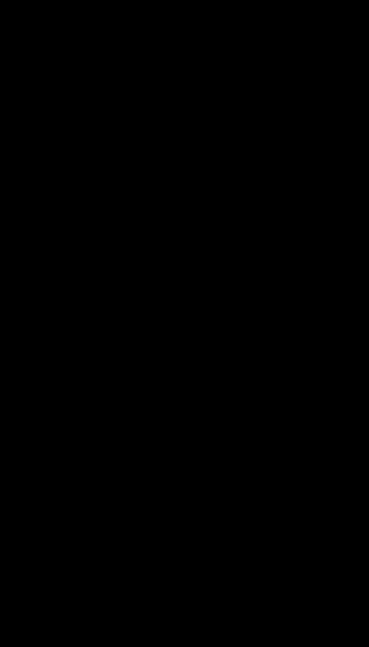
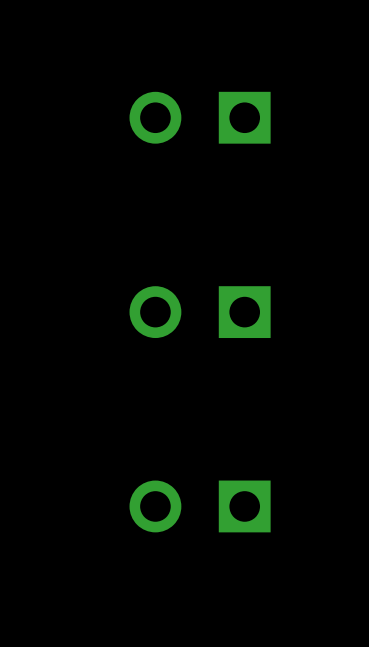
part: none -> (200, 117)
part: none -> (200, 312)
part: none -> (200, 506)

